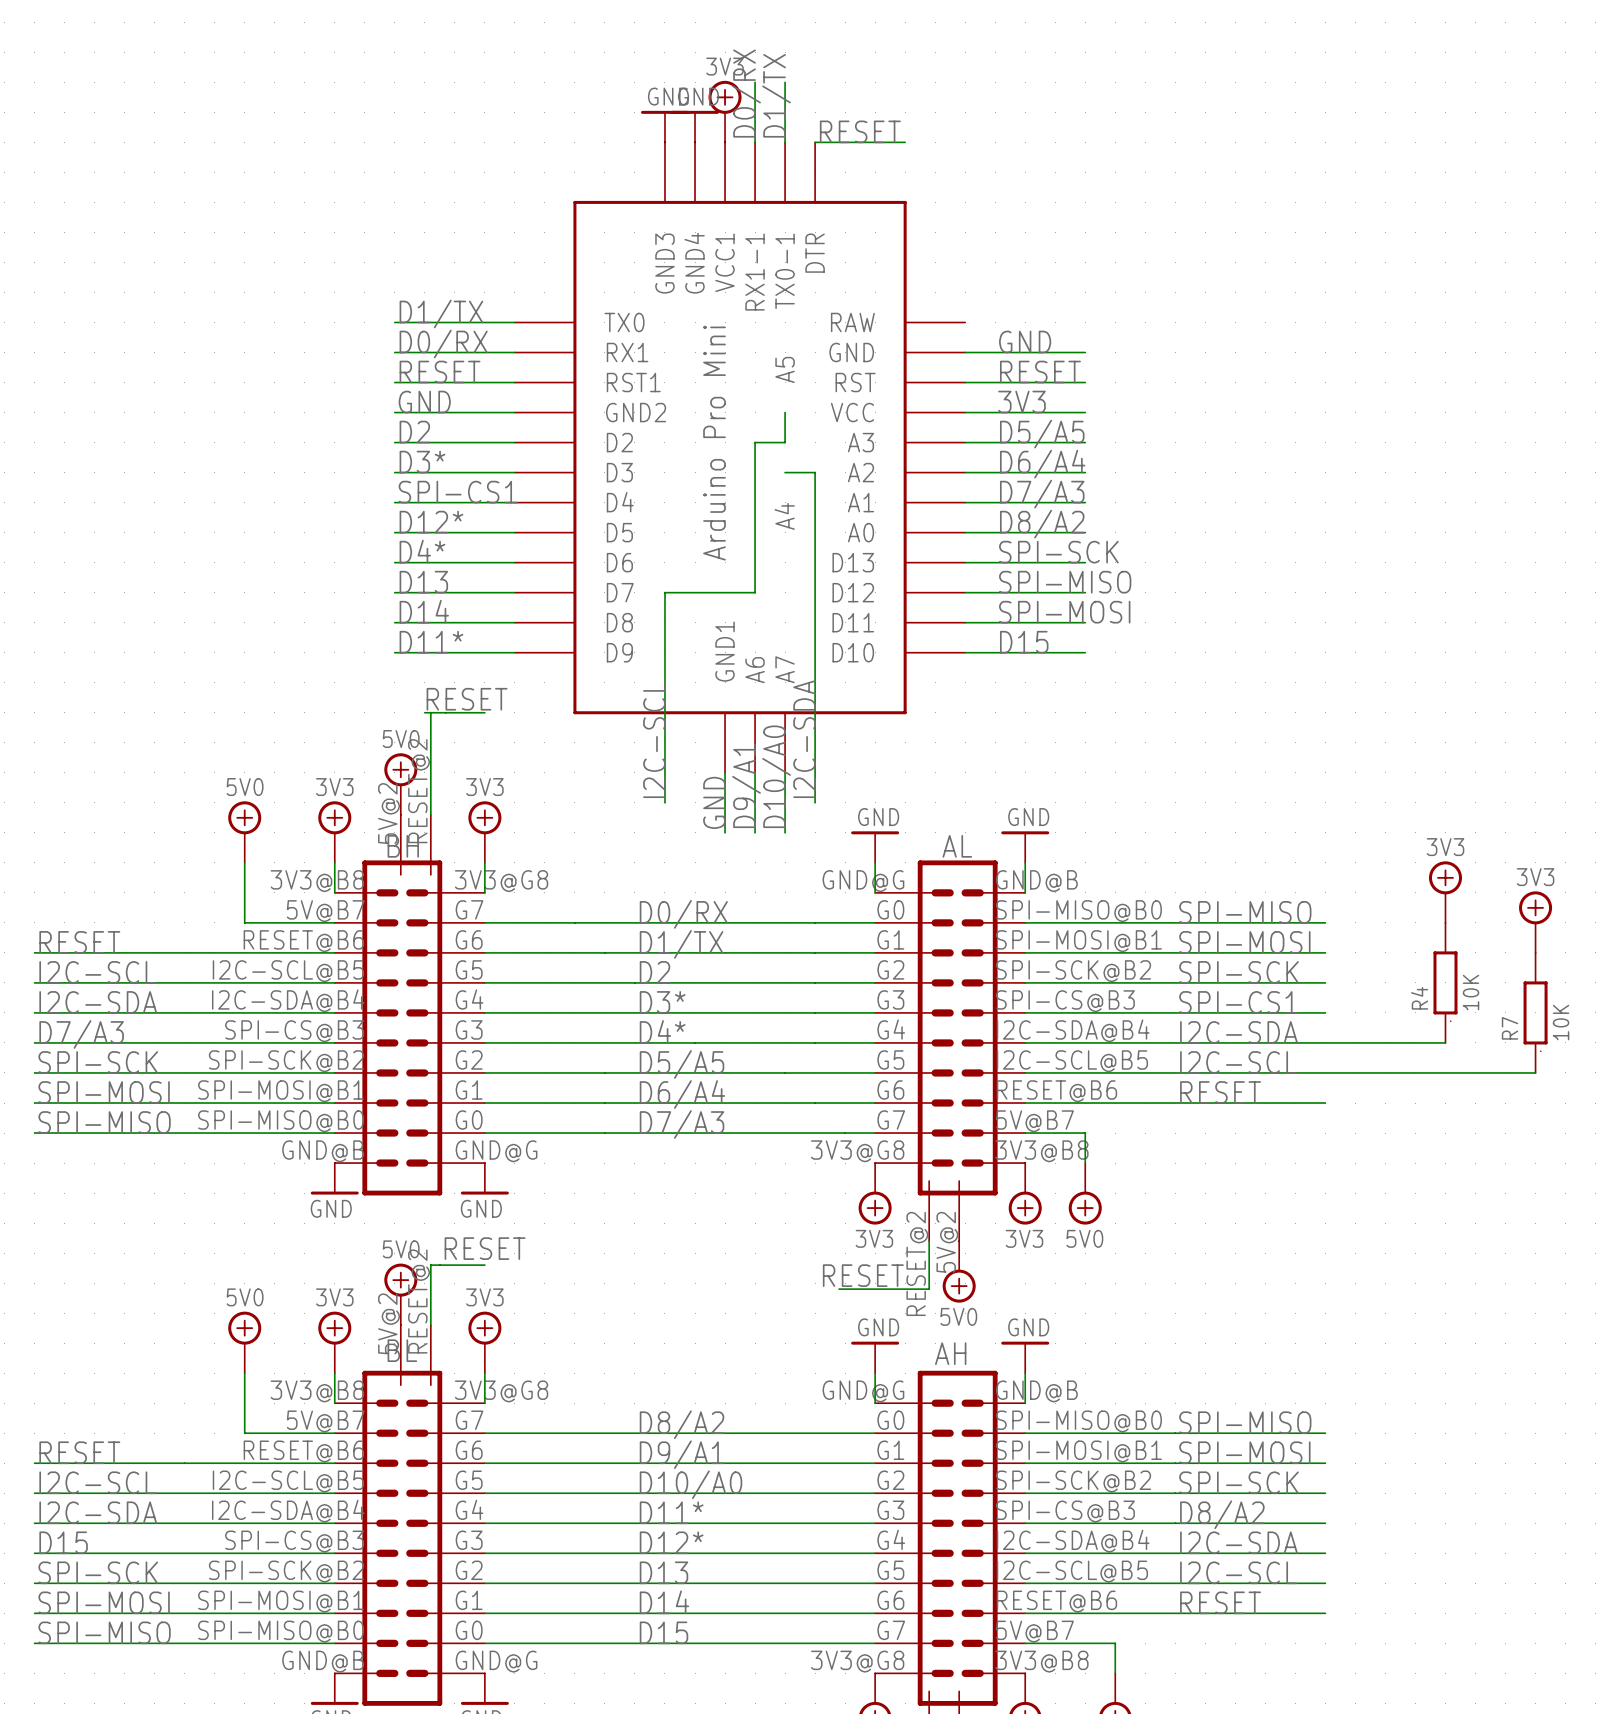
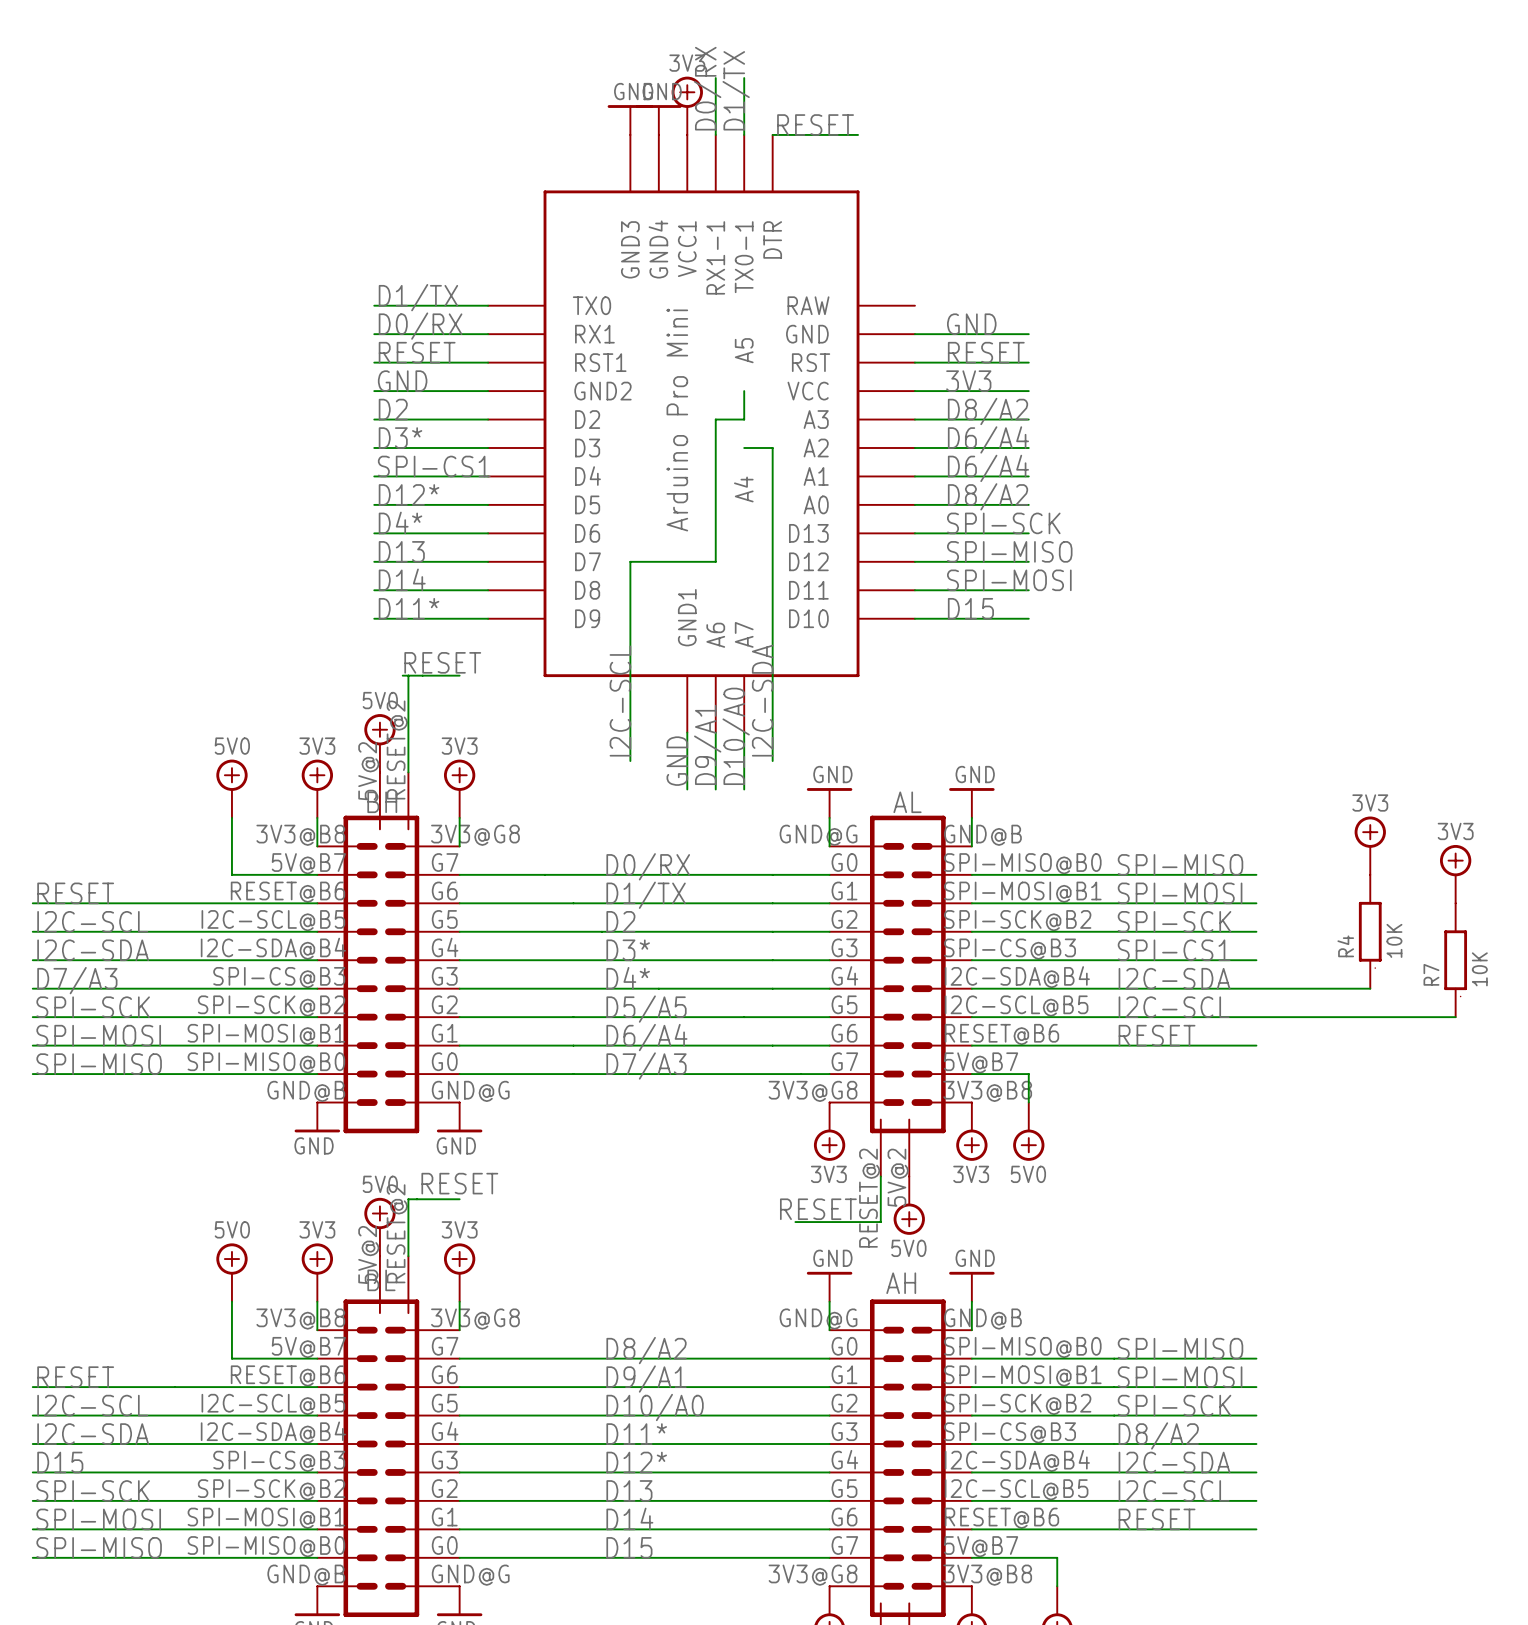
label: D5/A5 (1042, 434) -> D8/A2 (988, 411)
label: D7/A3 (1042, 494) -> D6/A4 (988, 468)

